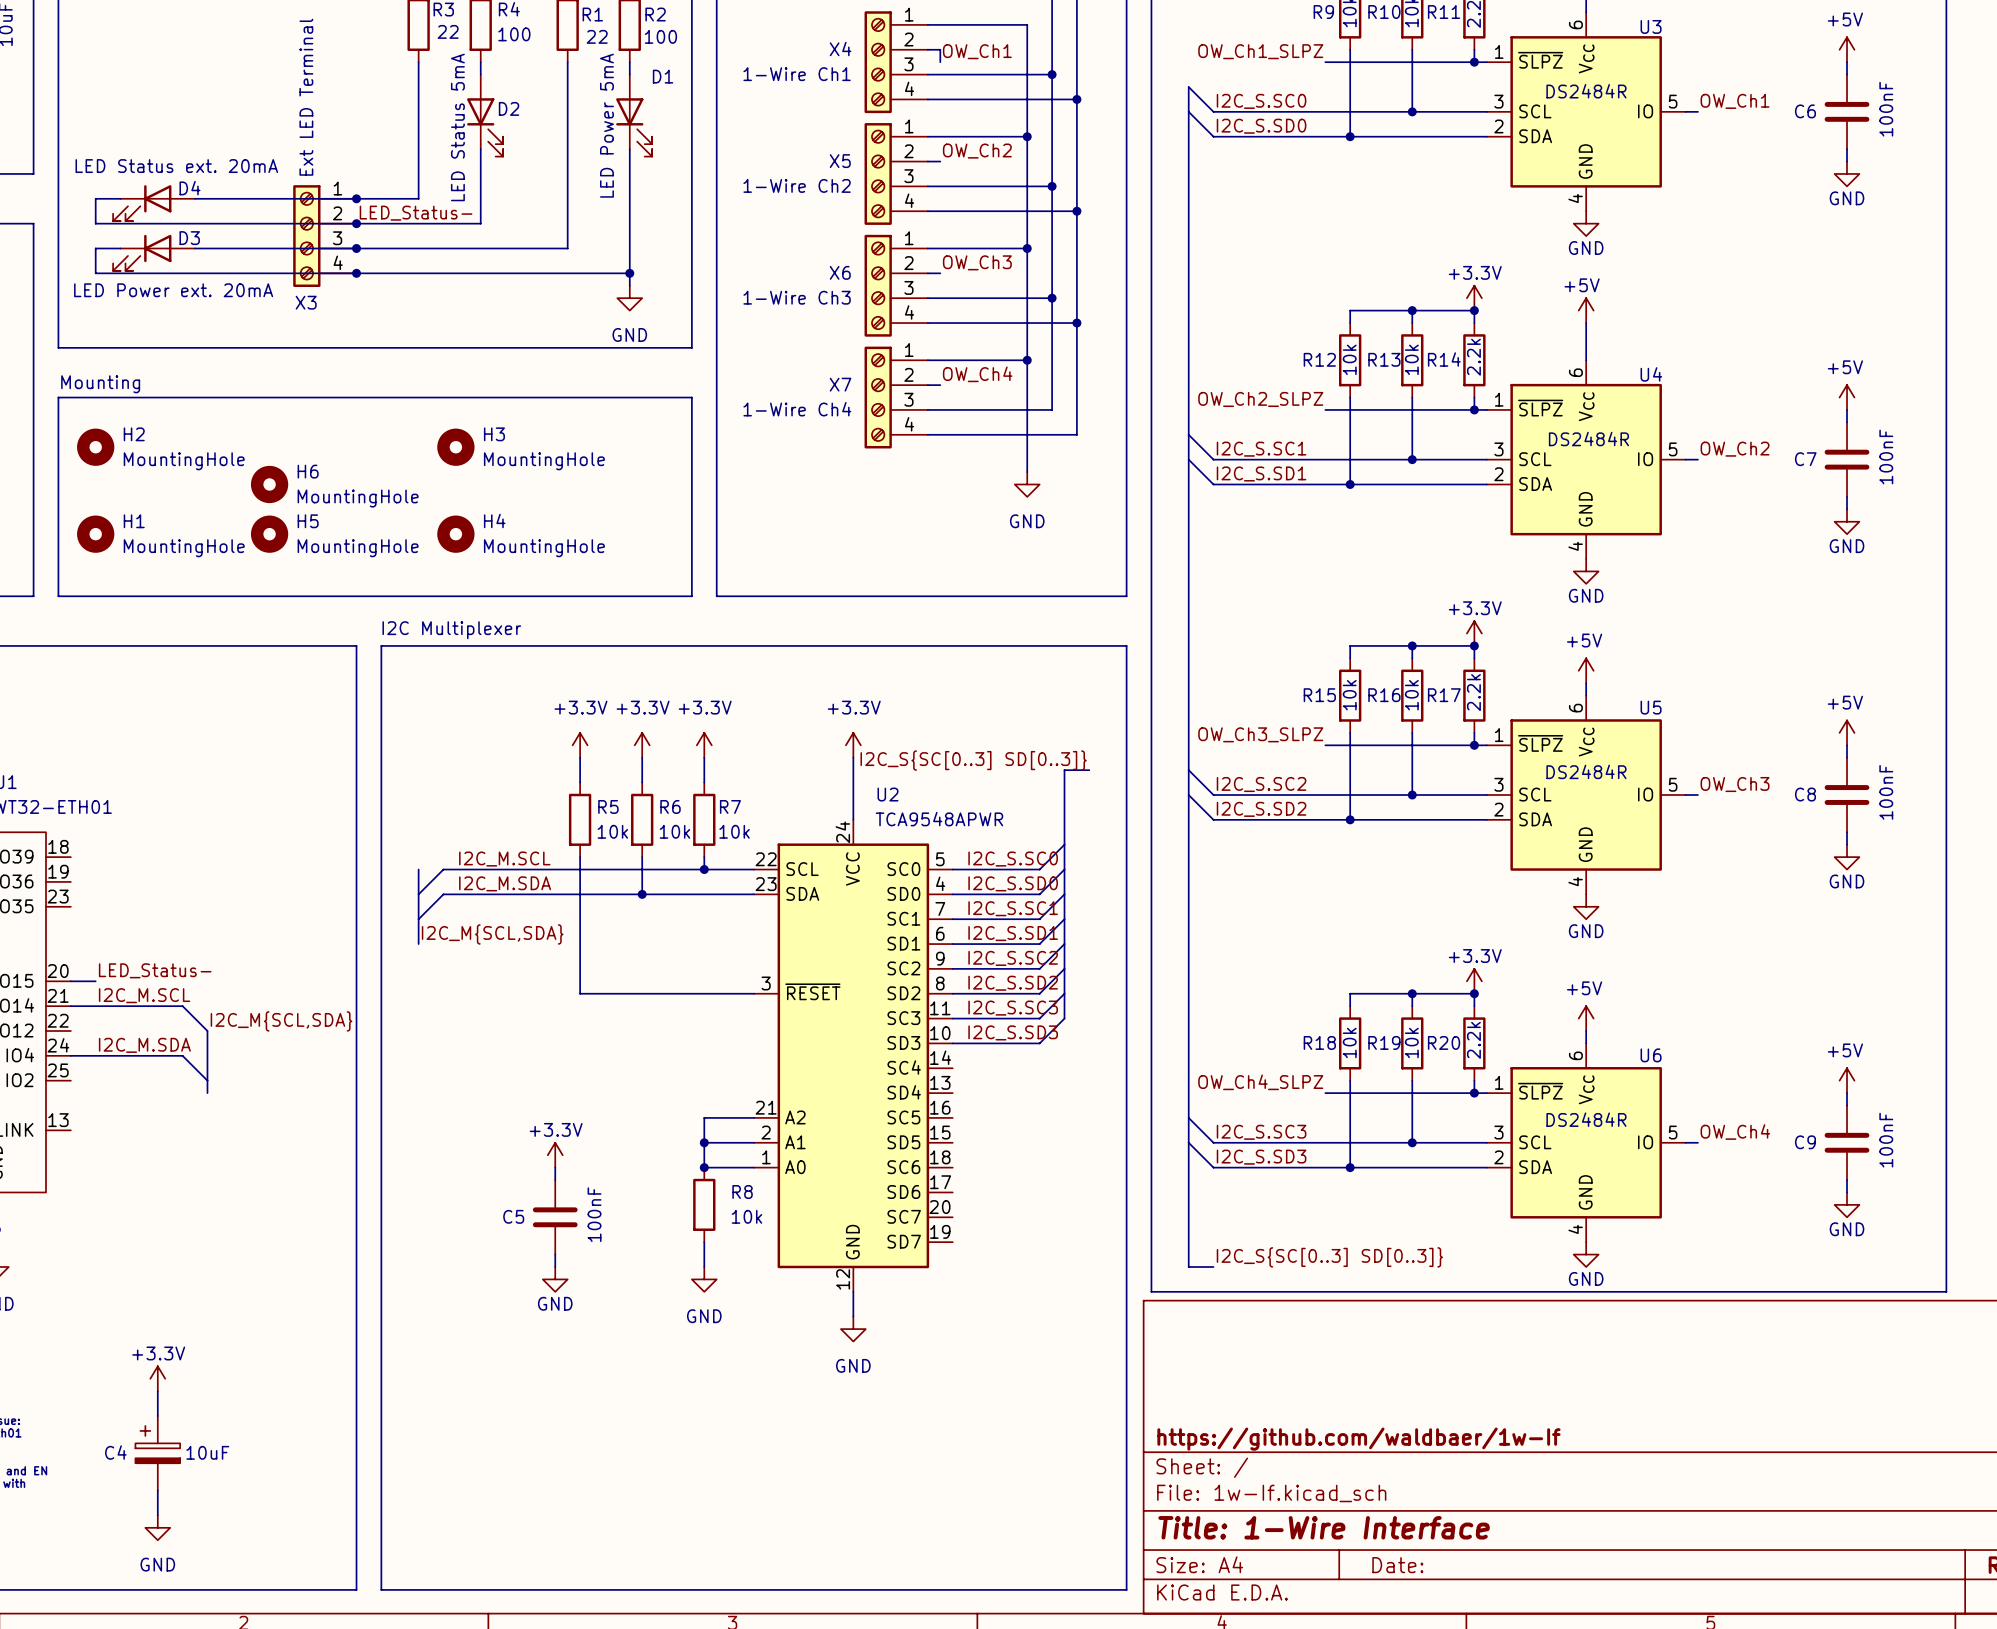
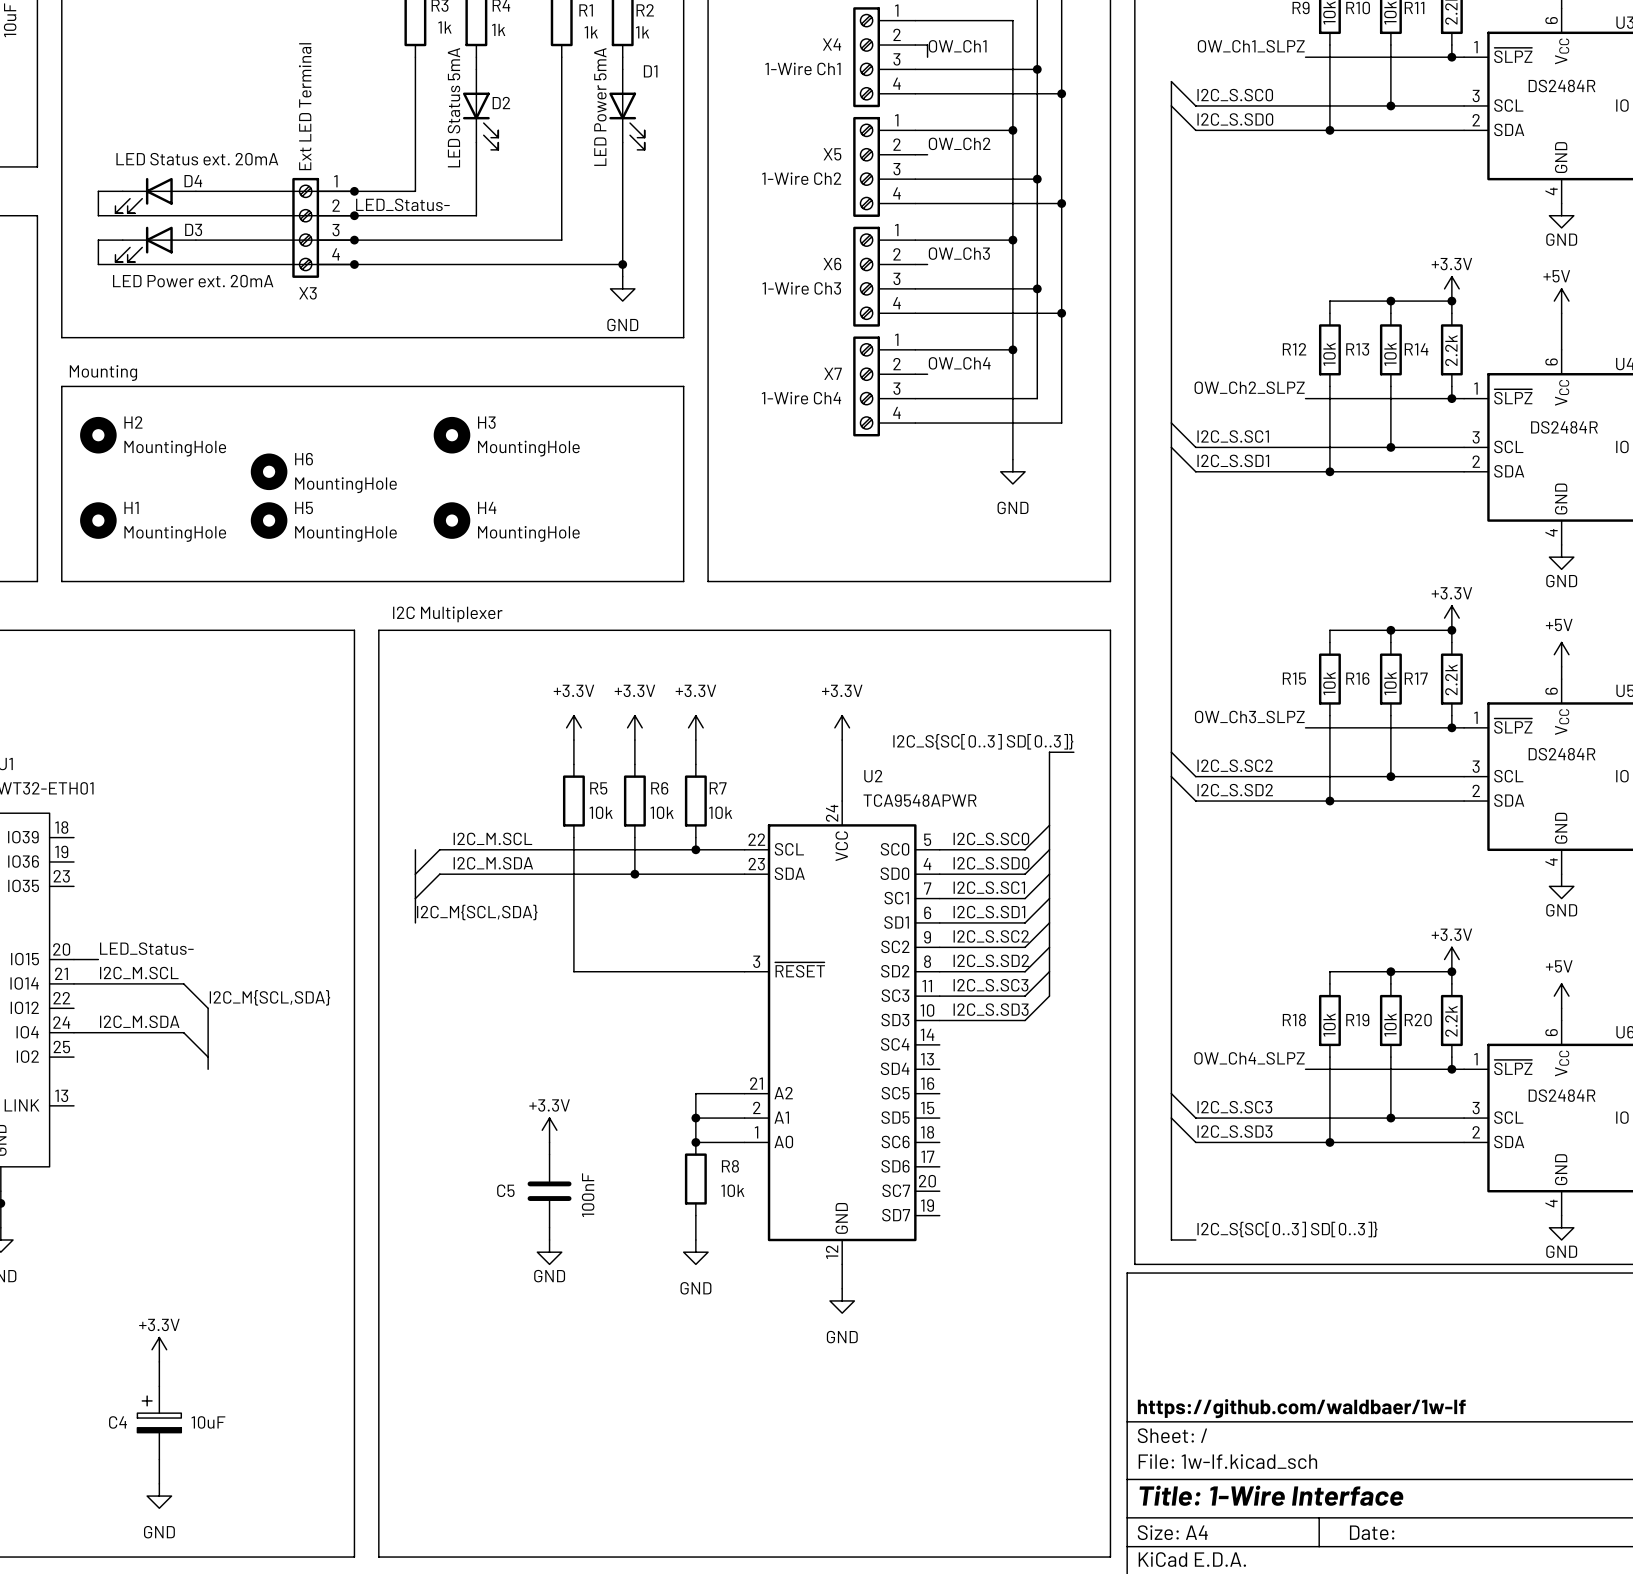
R3 value: 22 (448, 31) -> 1k (444, 27)
R4 value: 100 (514, 34) -> 1k (498, 29)
R1 value: 22 (597, 36) -> 1k (591, 32)
R2 value: 100 (660, 36) -> 1k (642, 32)

